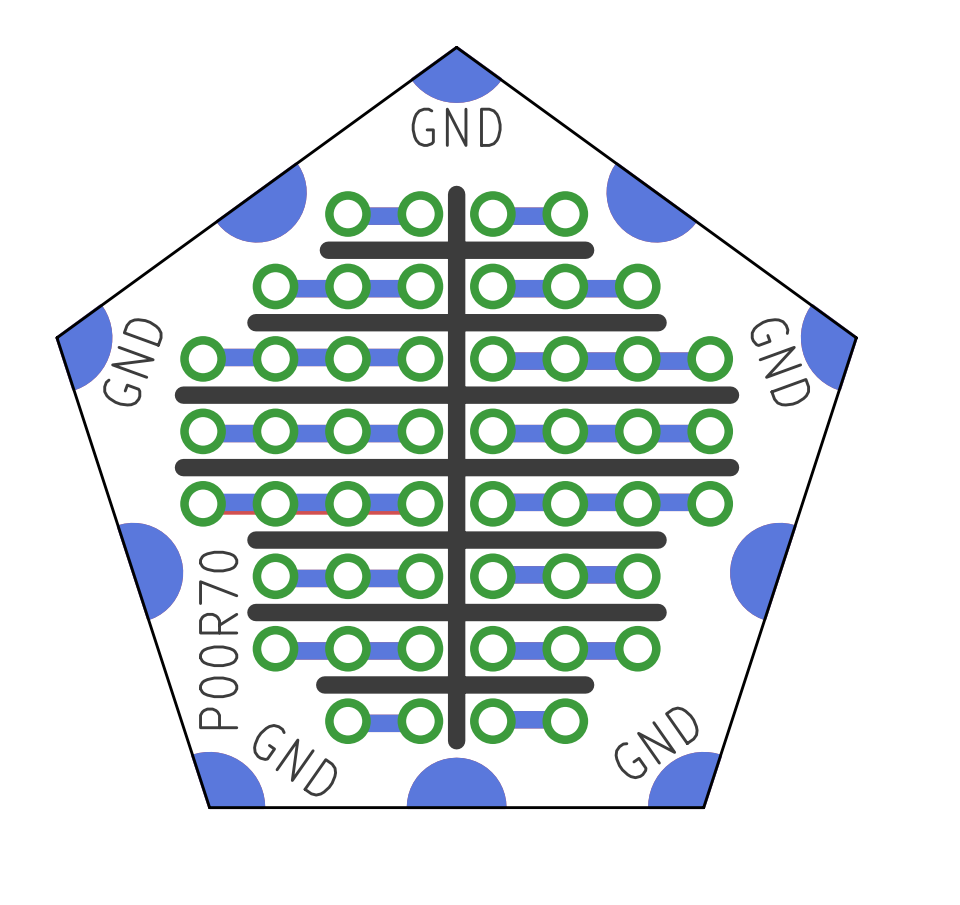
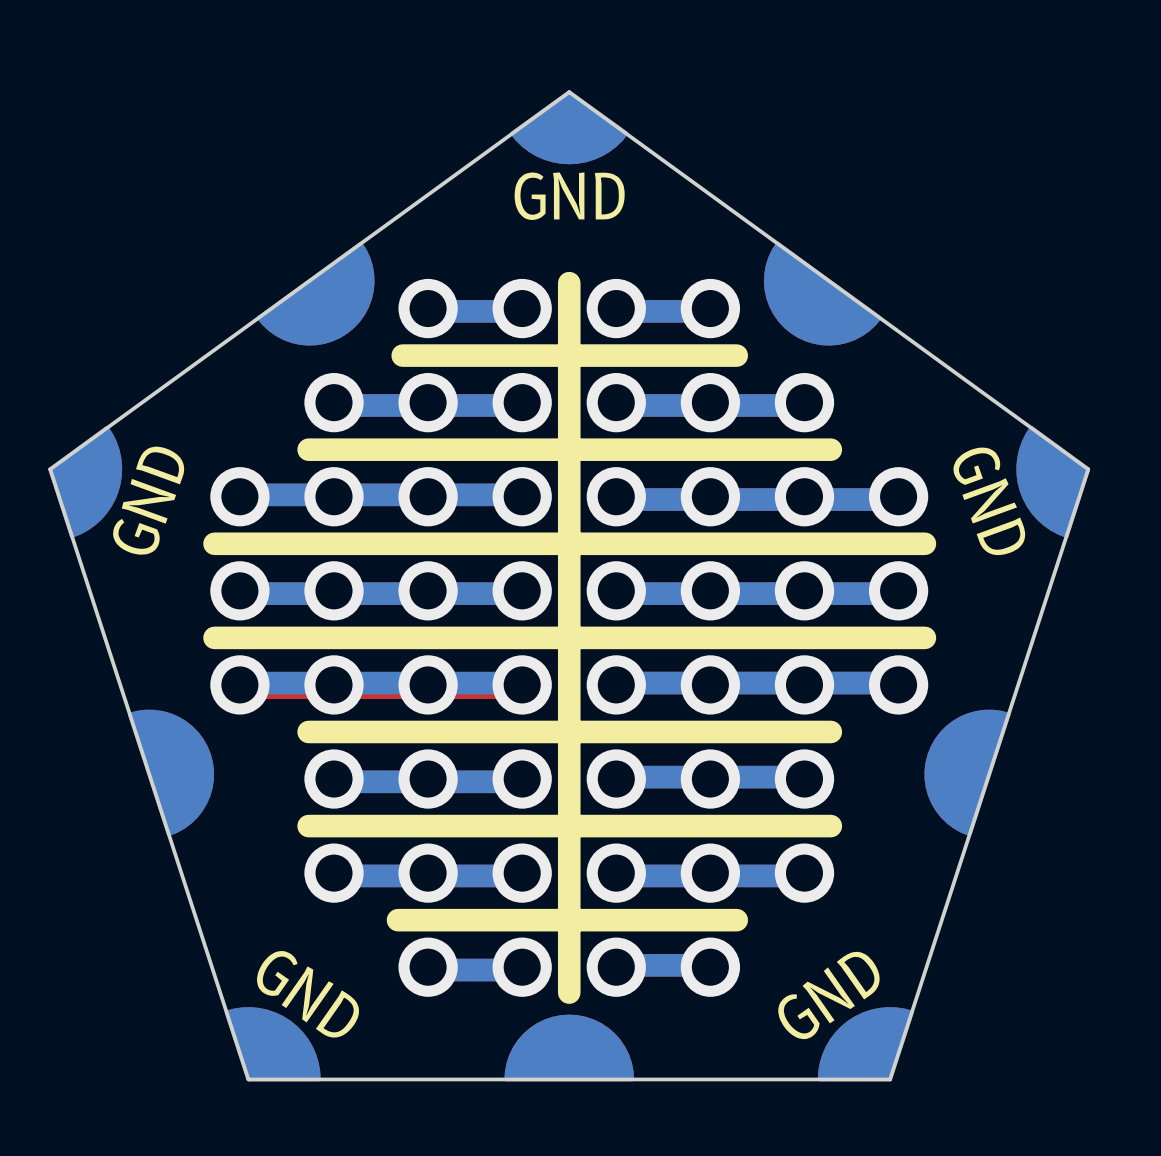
text: P00R70 (218, 639) -> none
text position: GND (295, 760) -> GND (308, 994)

